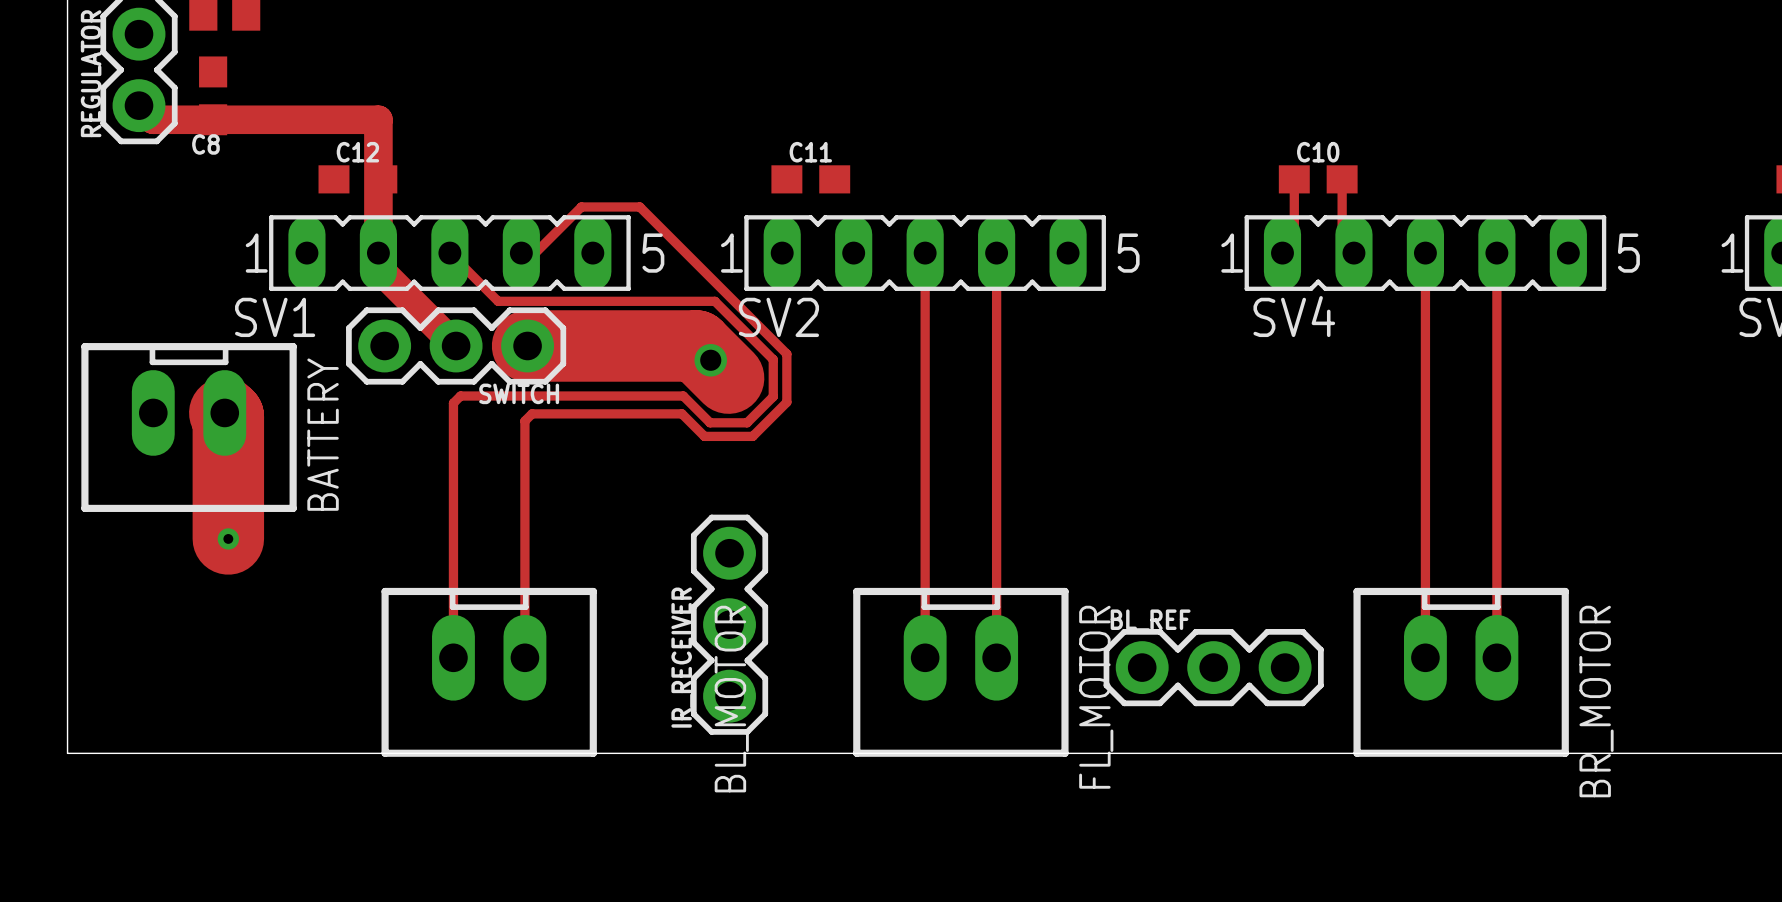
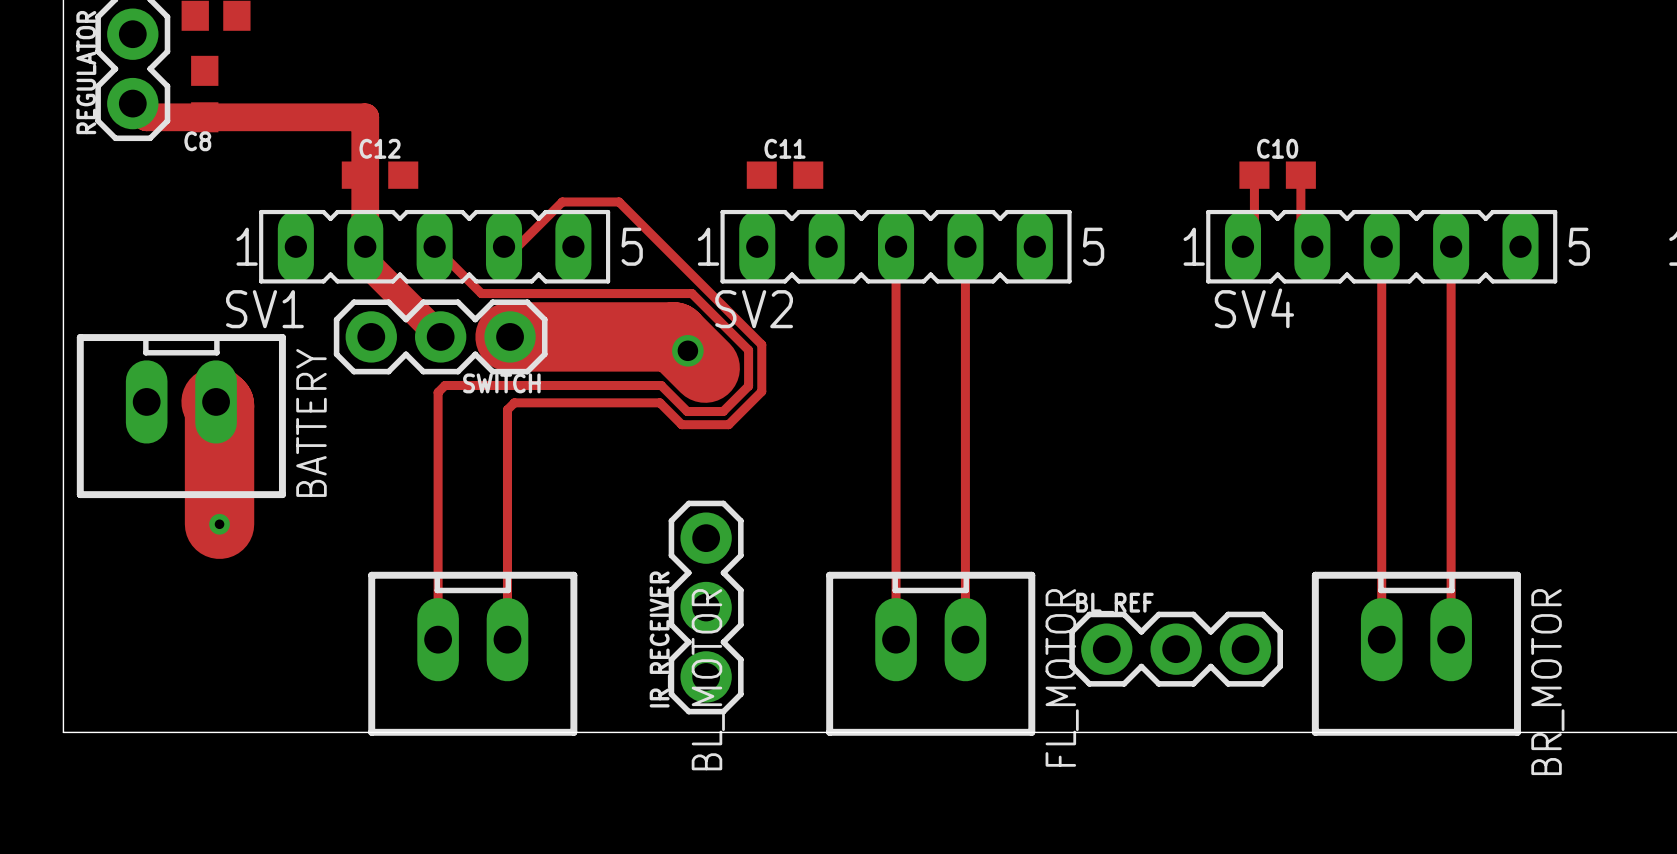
C12 position: (357, 179) -> (380, 175)

